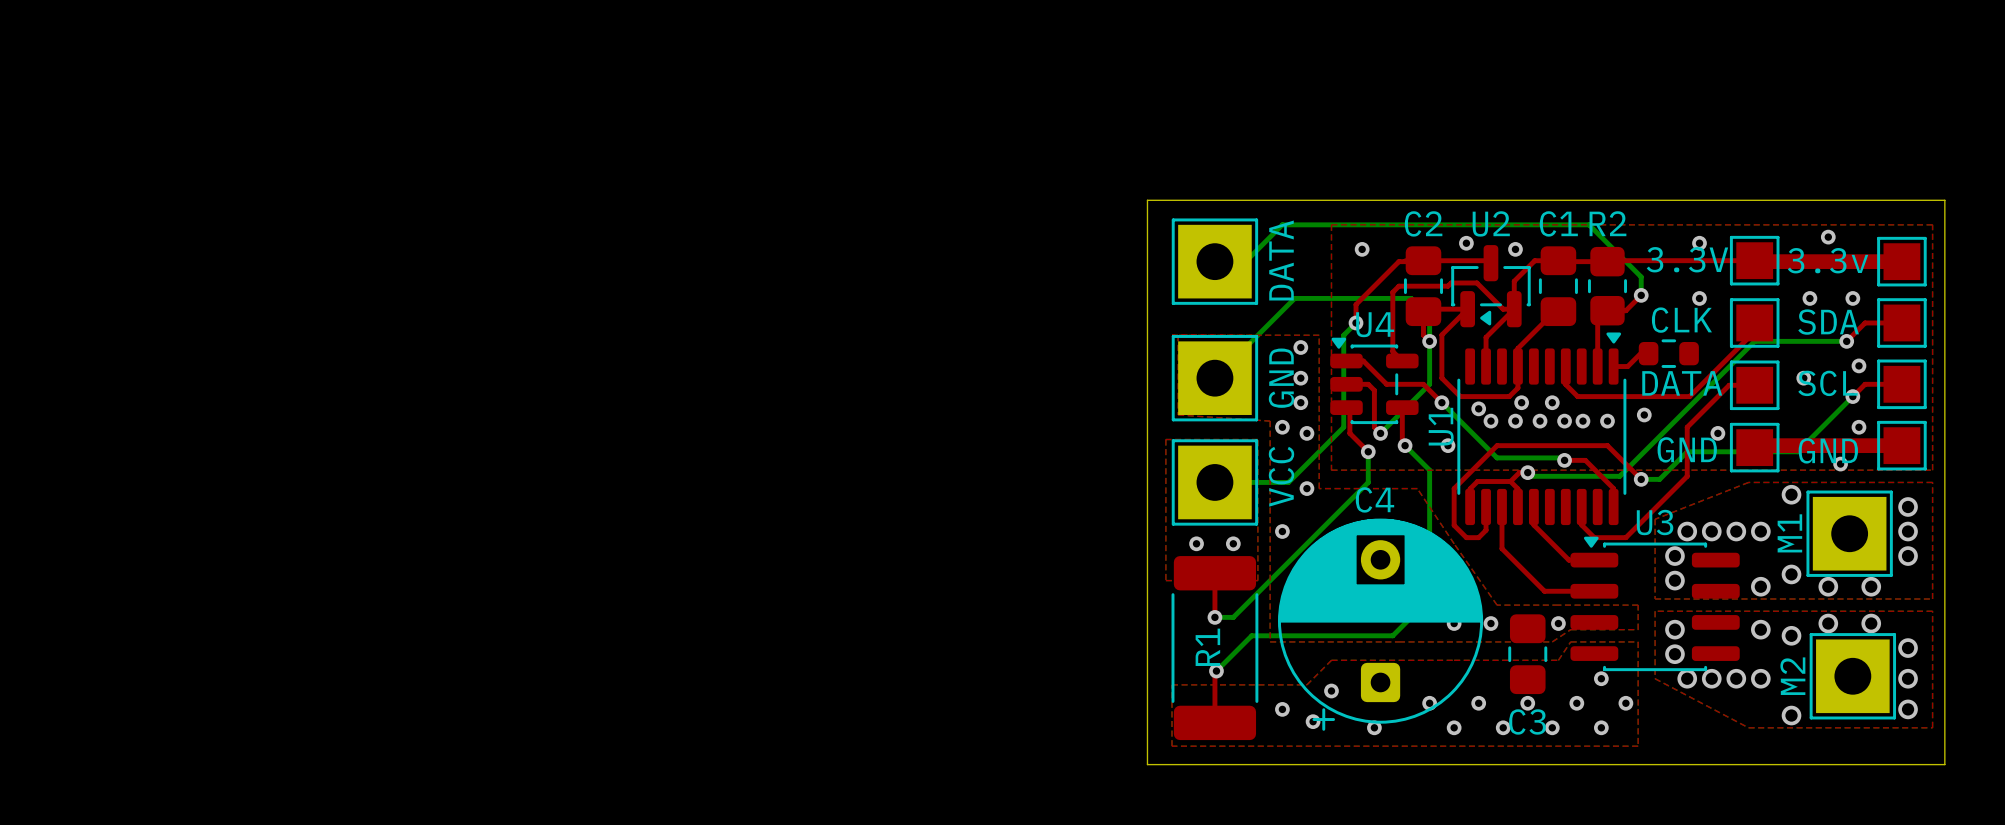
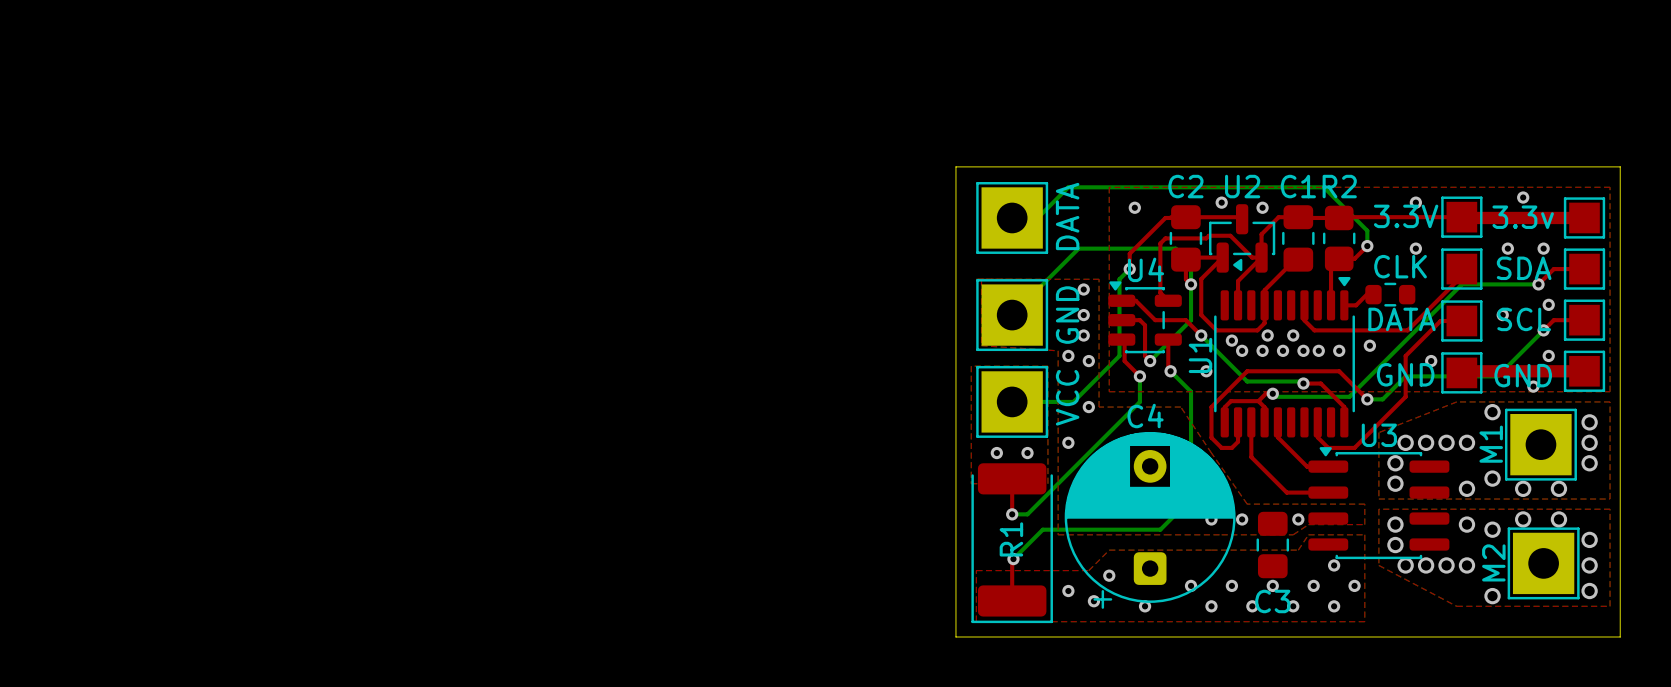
R1 footprint: [1171, 556, 1259, 741] -> [971, 463, 1053, 624]

